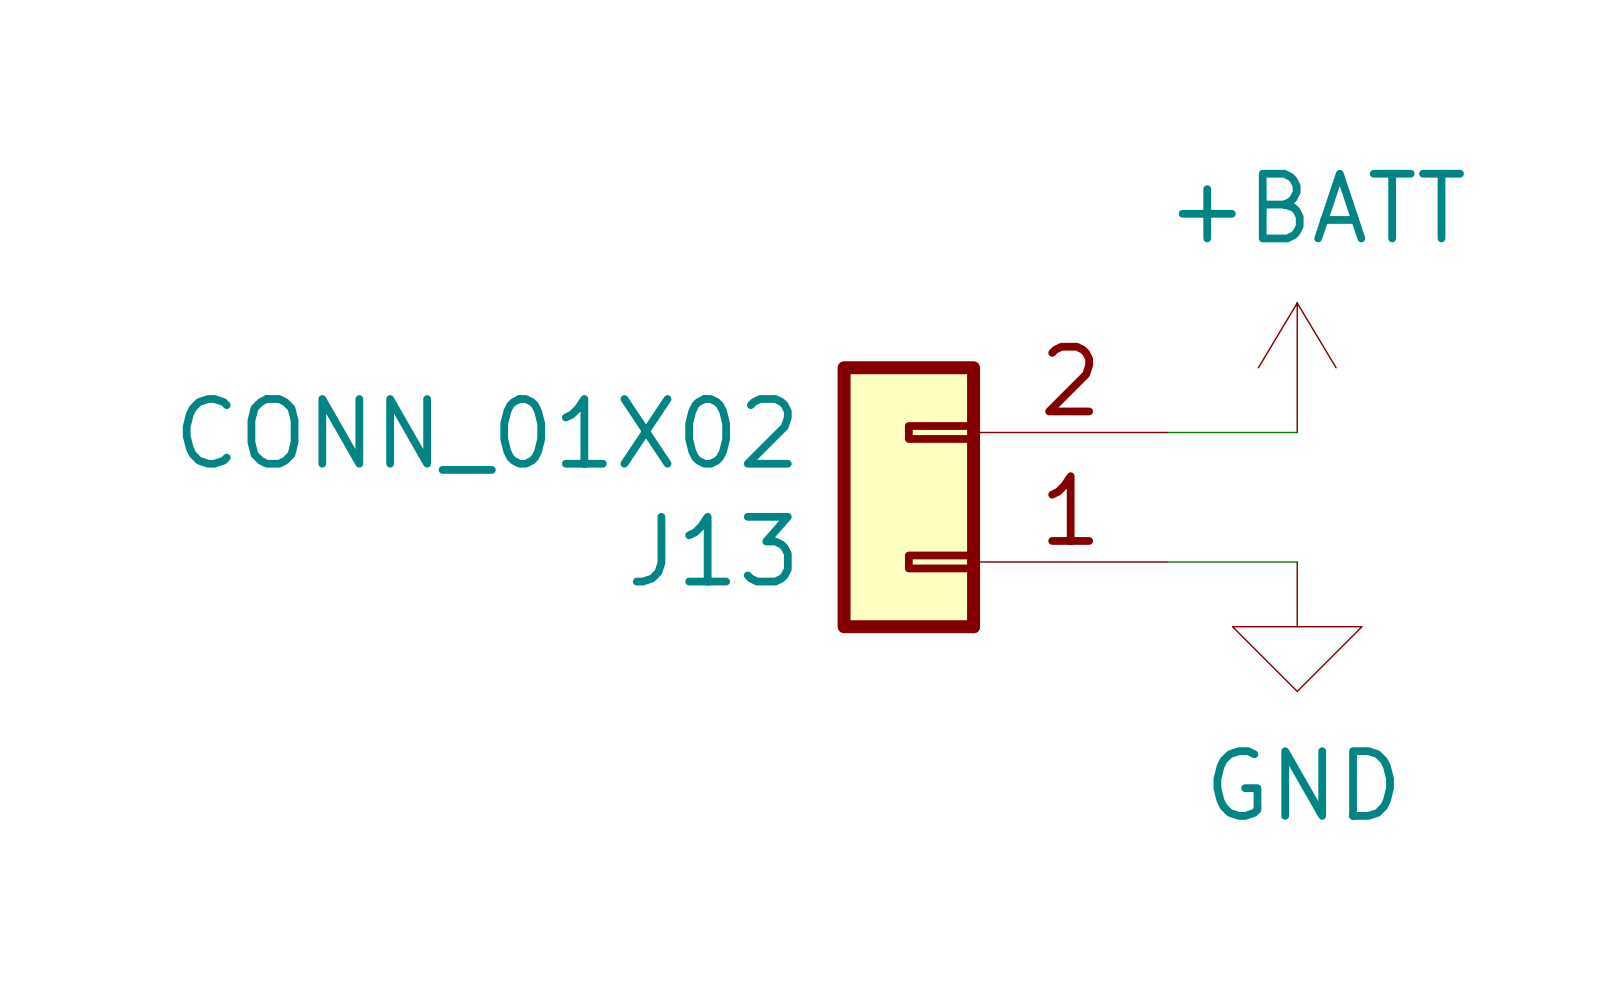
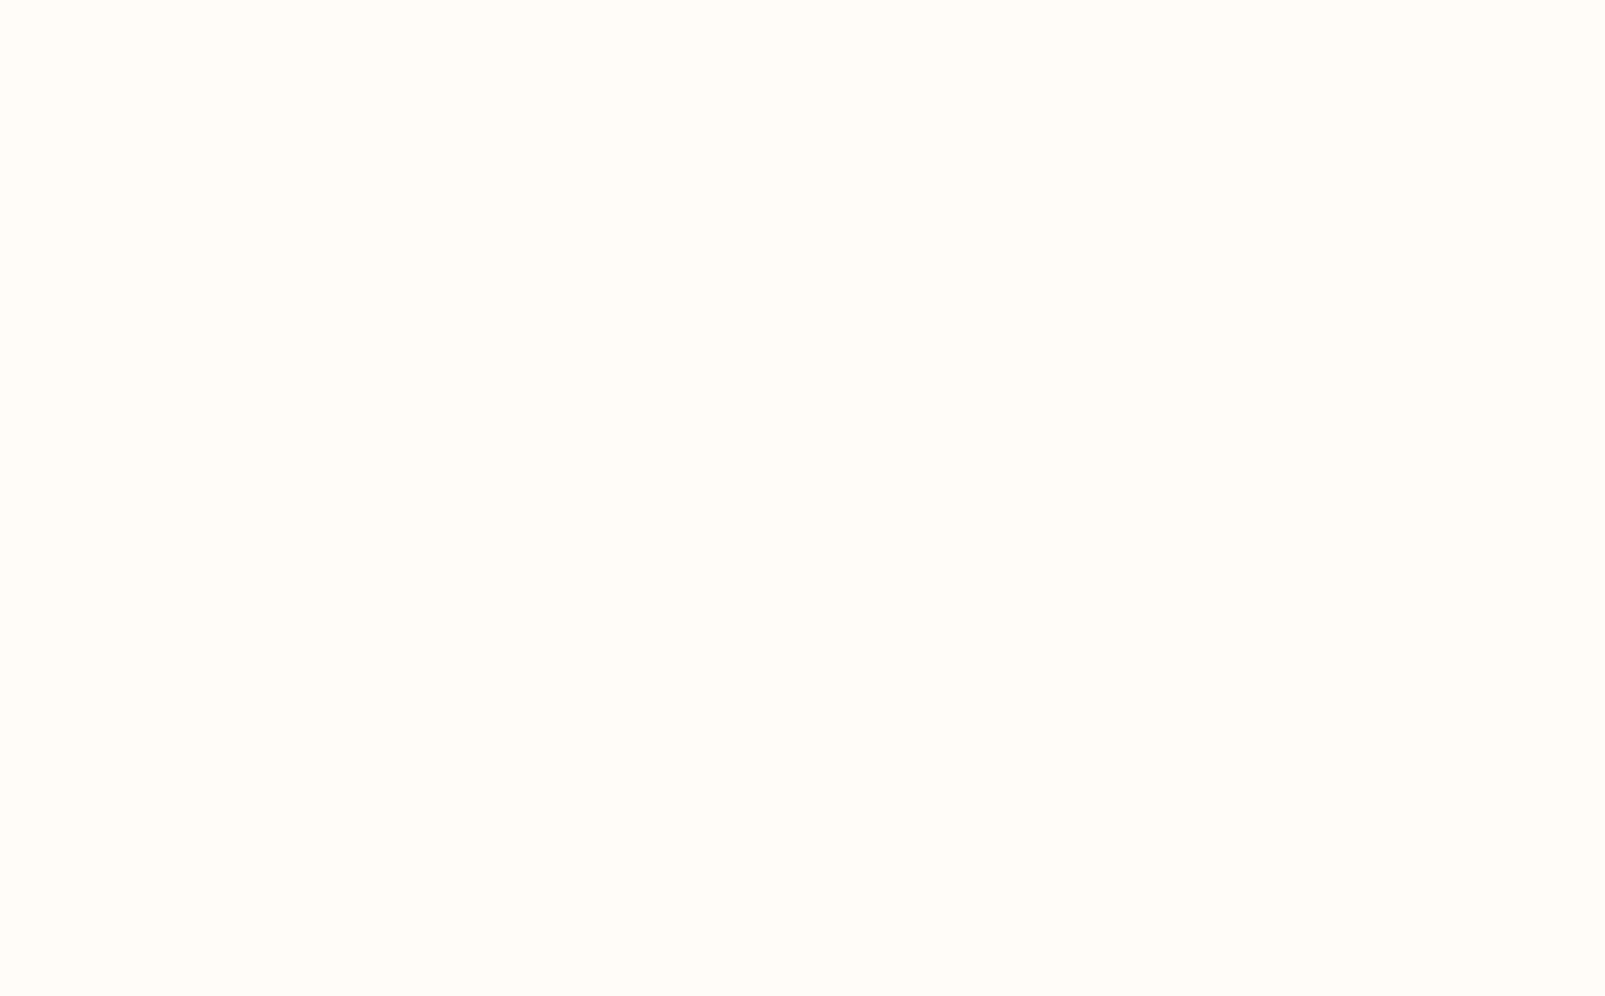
power symbol: +BATT (1297, 367) -> none
wire: (1167, 432) (1297, 432) -> none
J13: CONN_01X02 (1002, 497) -> none
wire: (1167, 561) (1297, 561) -> none
power symbol: GND (1297, 626) -> none

